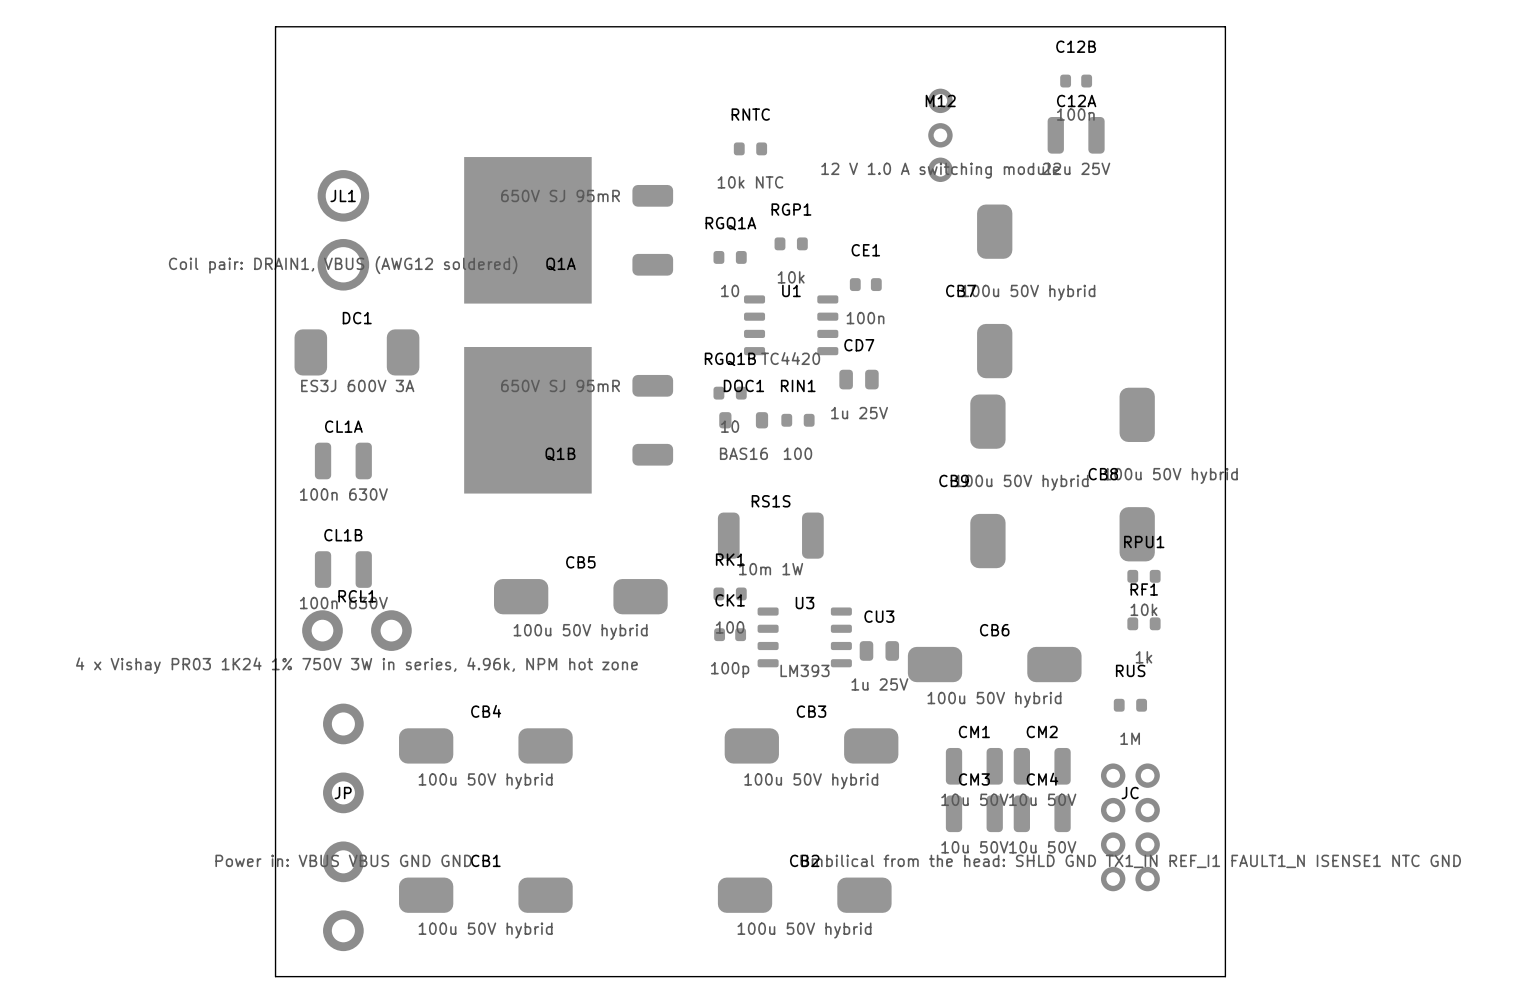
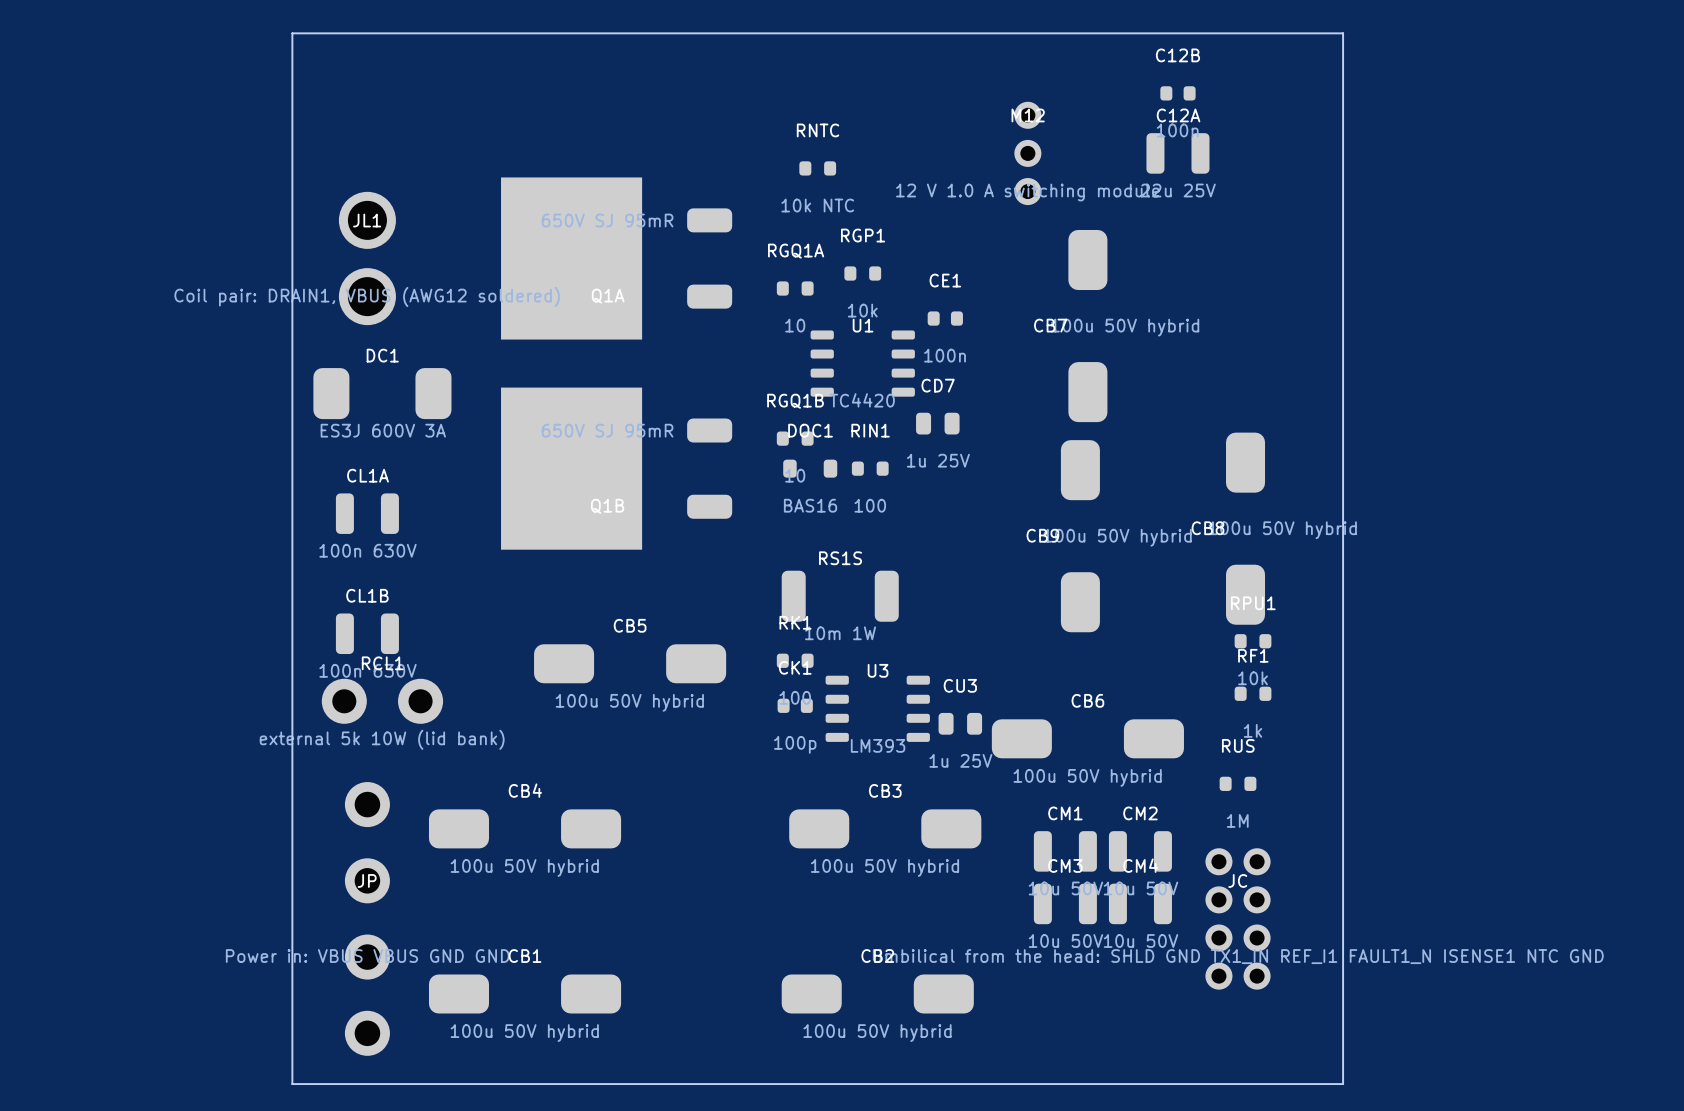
RCL1 value: 4 x Vishay PR03 1K24 1% 750V 3W in series, 4.96k, NPM hot zone (356, 665) -> external 5k 10W (lid bank) (382, 739)

